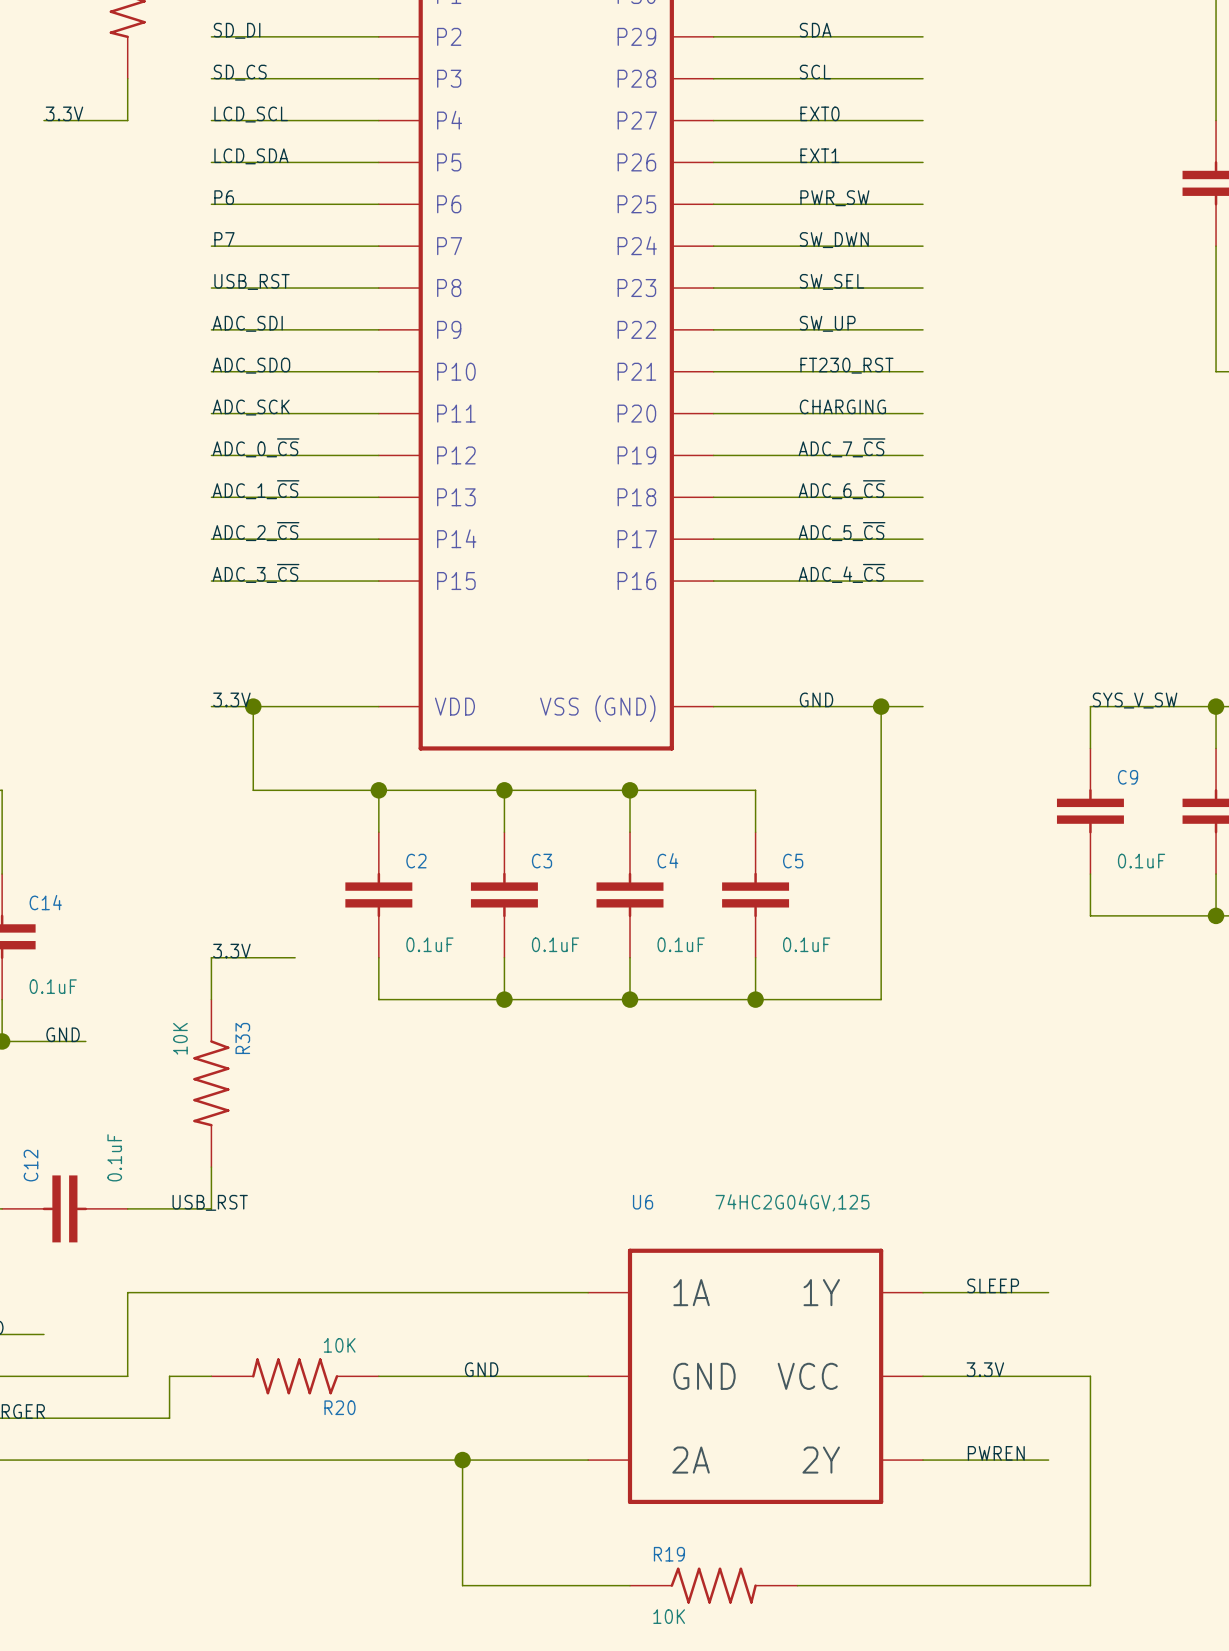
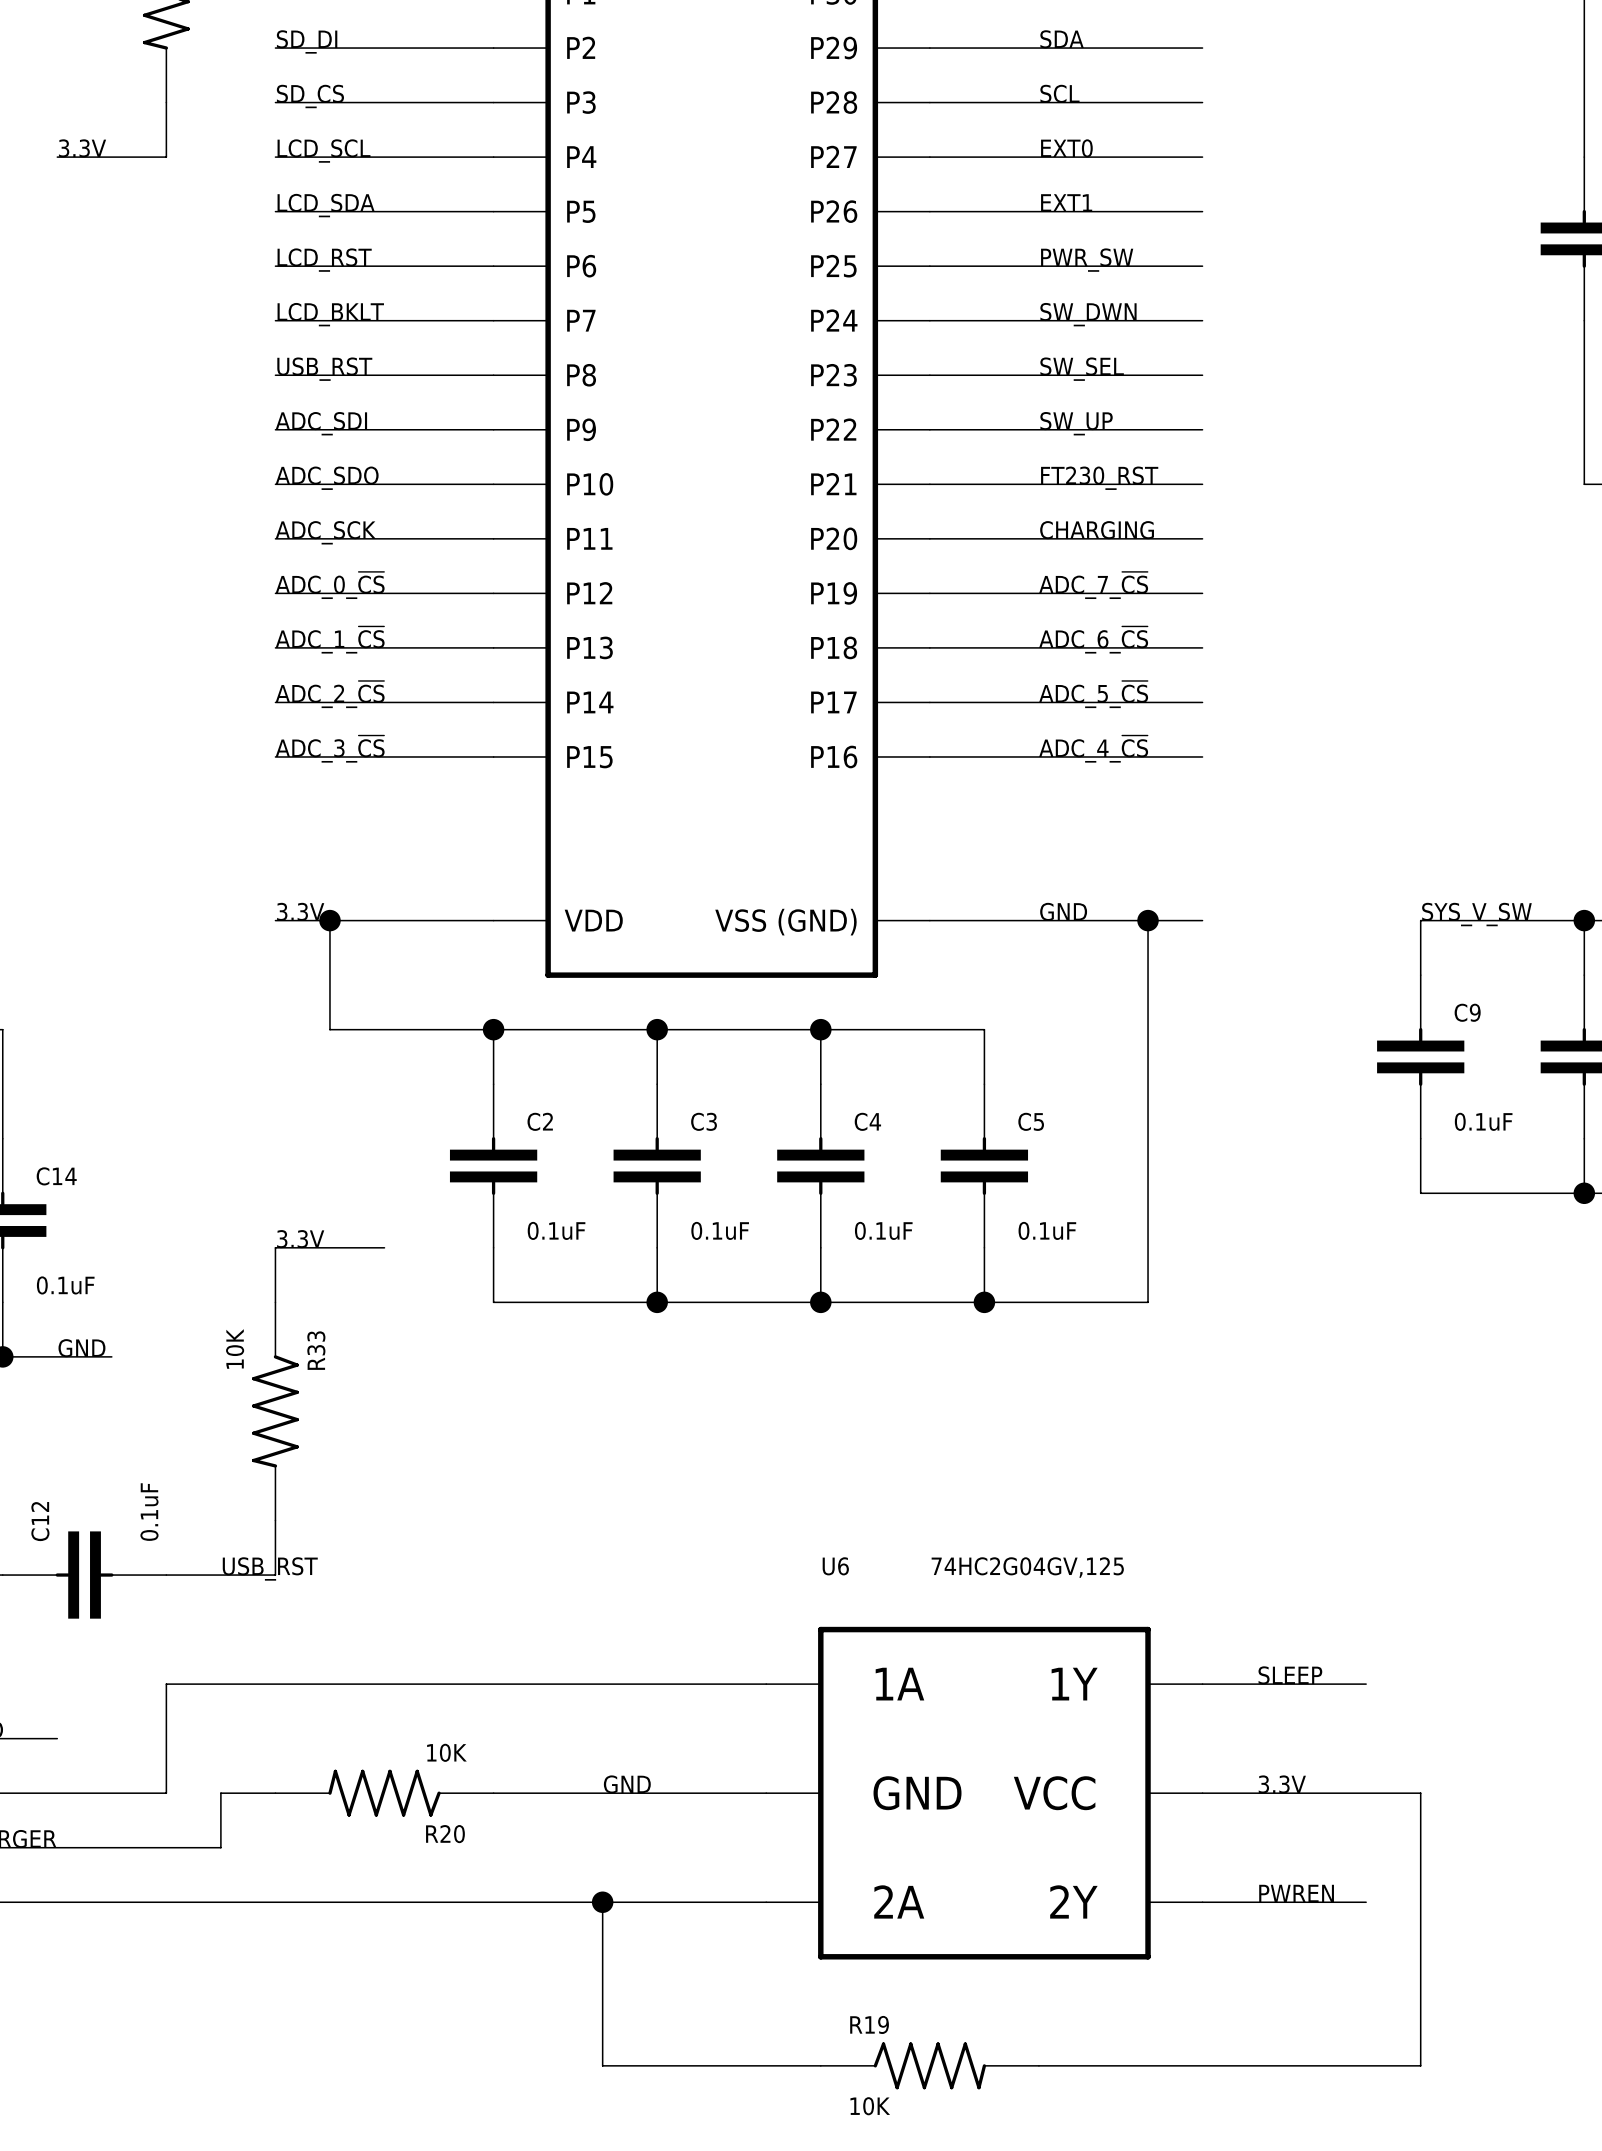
label: P6 (224, 197) -> LCD_RST (324, 260)
label: P7 (224, 239) -> LCD_BKLT (330, 314)

